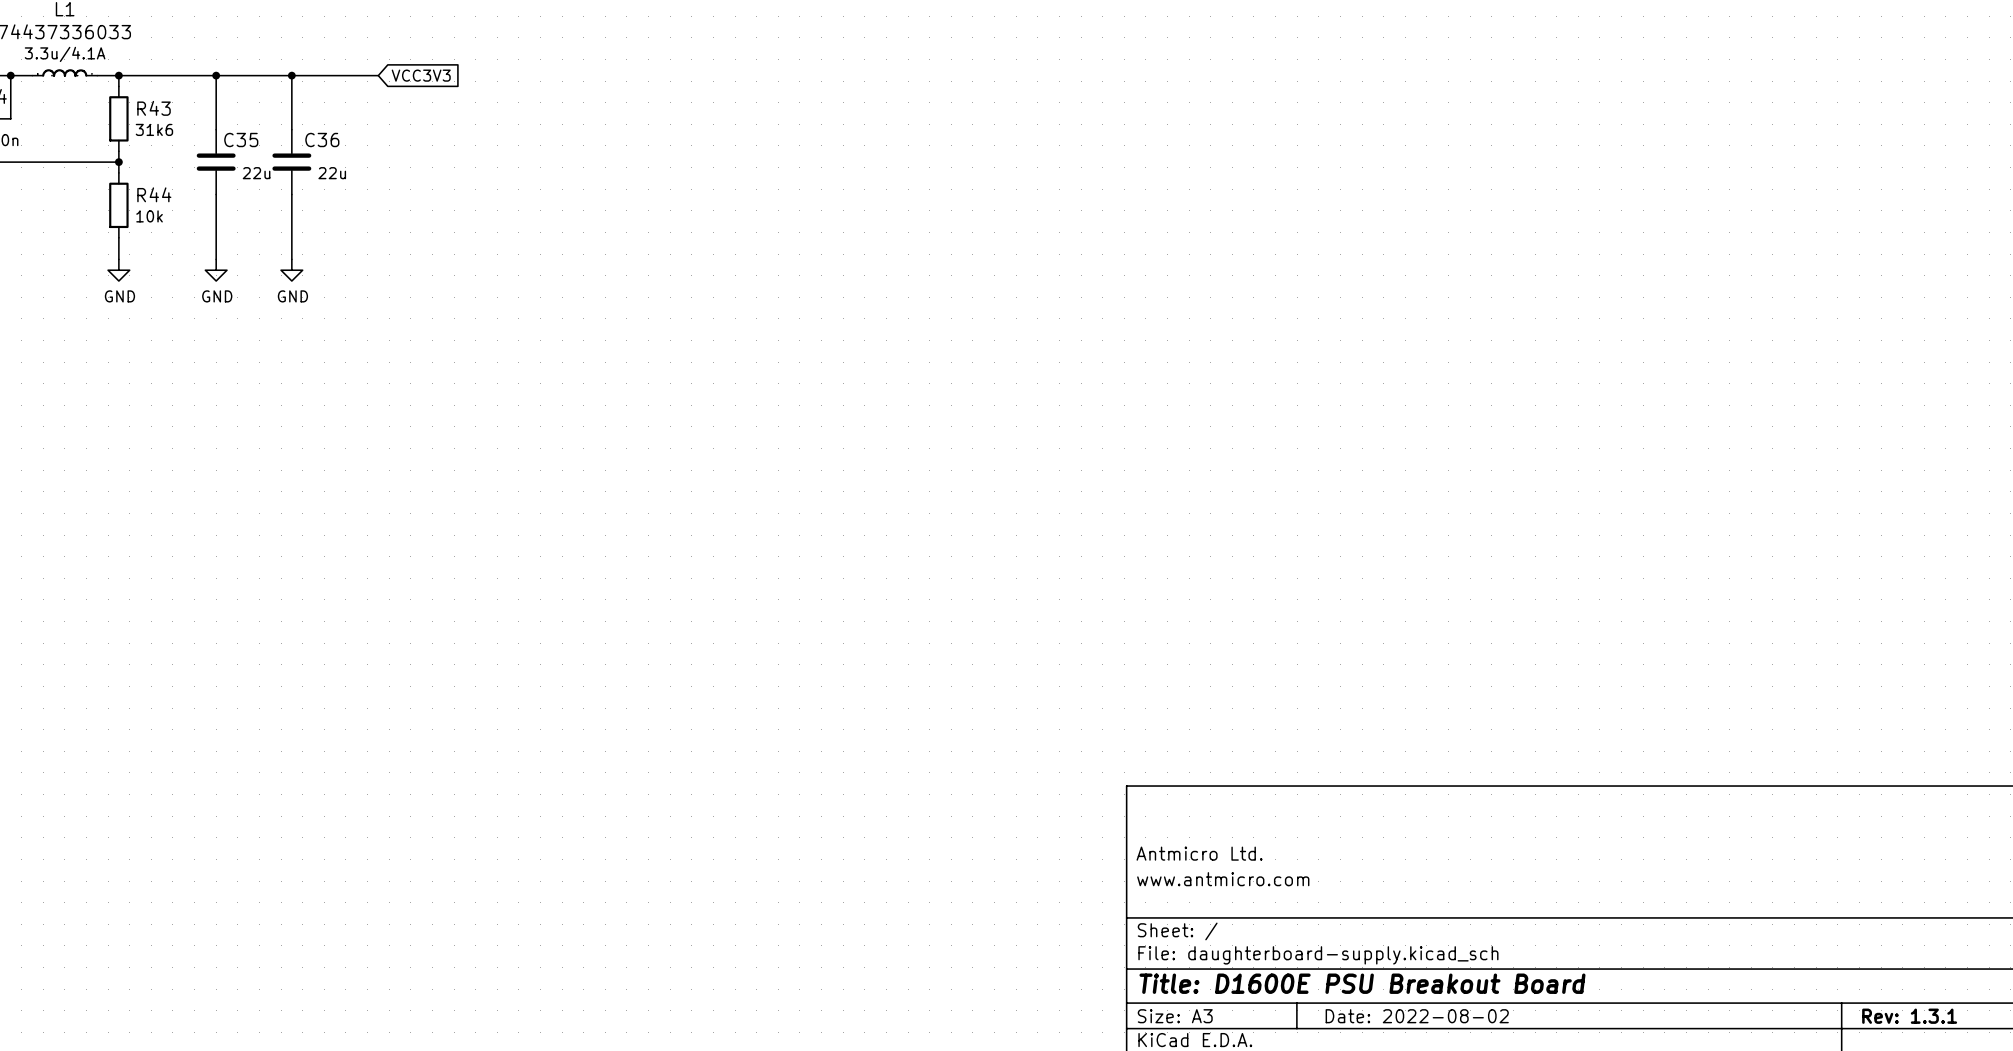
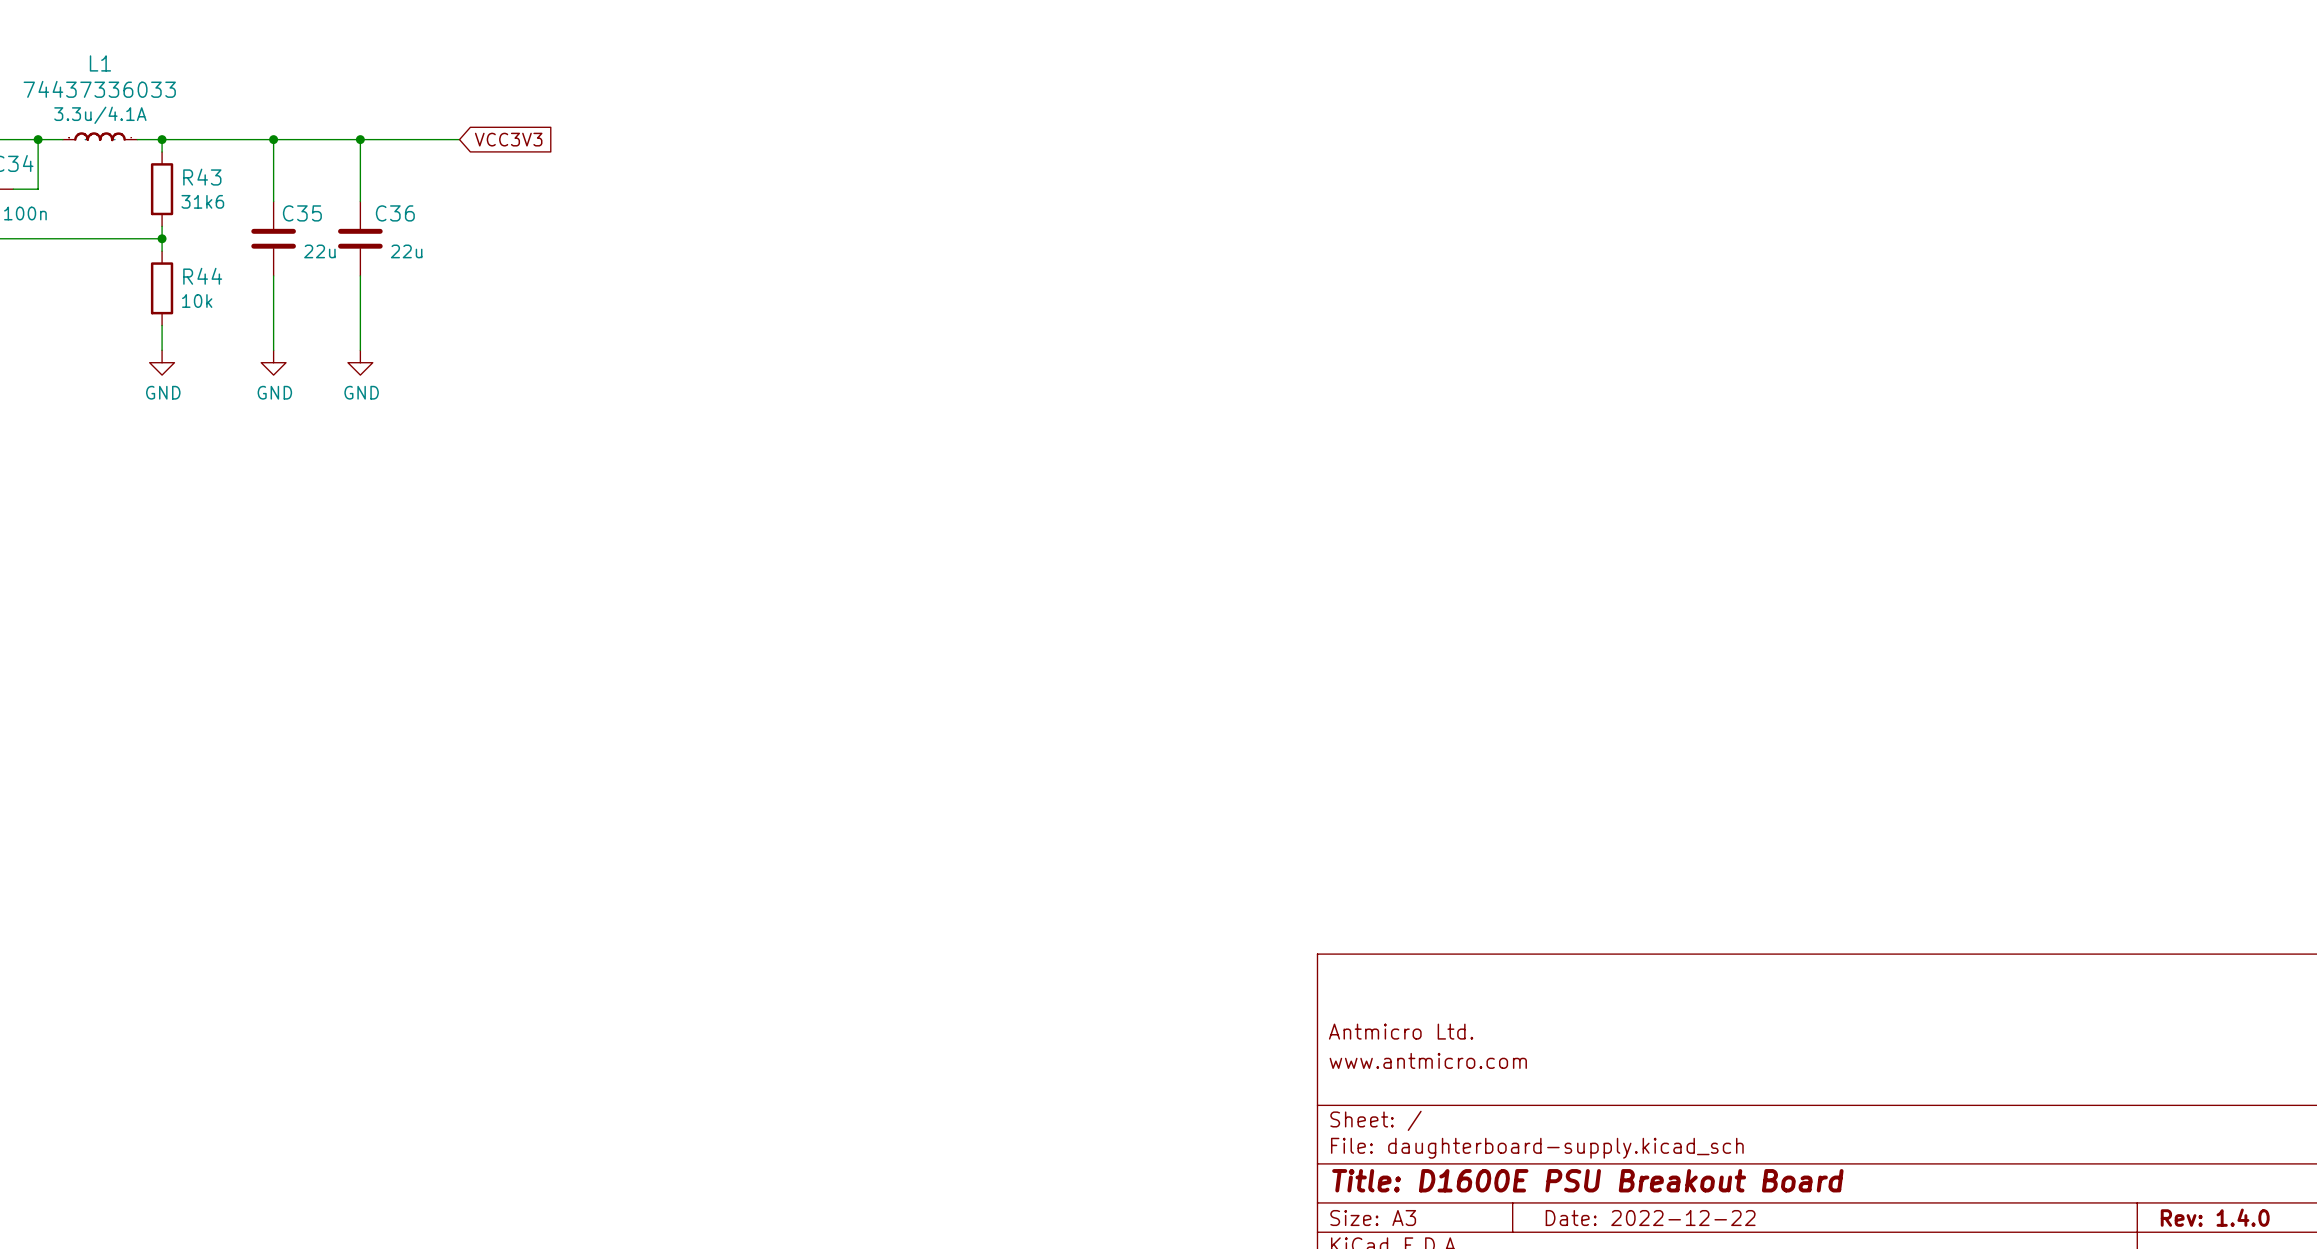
title block: Date: 2022-08-02 (1417, 1016) -> Date: 2022-12-22 (1650, 1218)
title block: Rev: 1.3.1 (1909, 1016) -> Rev: 1.4.0 (2215, 1217)

